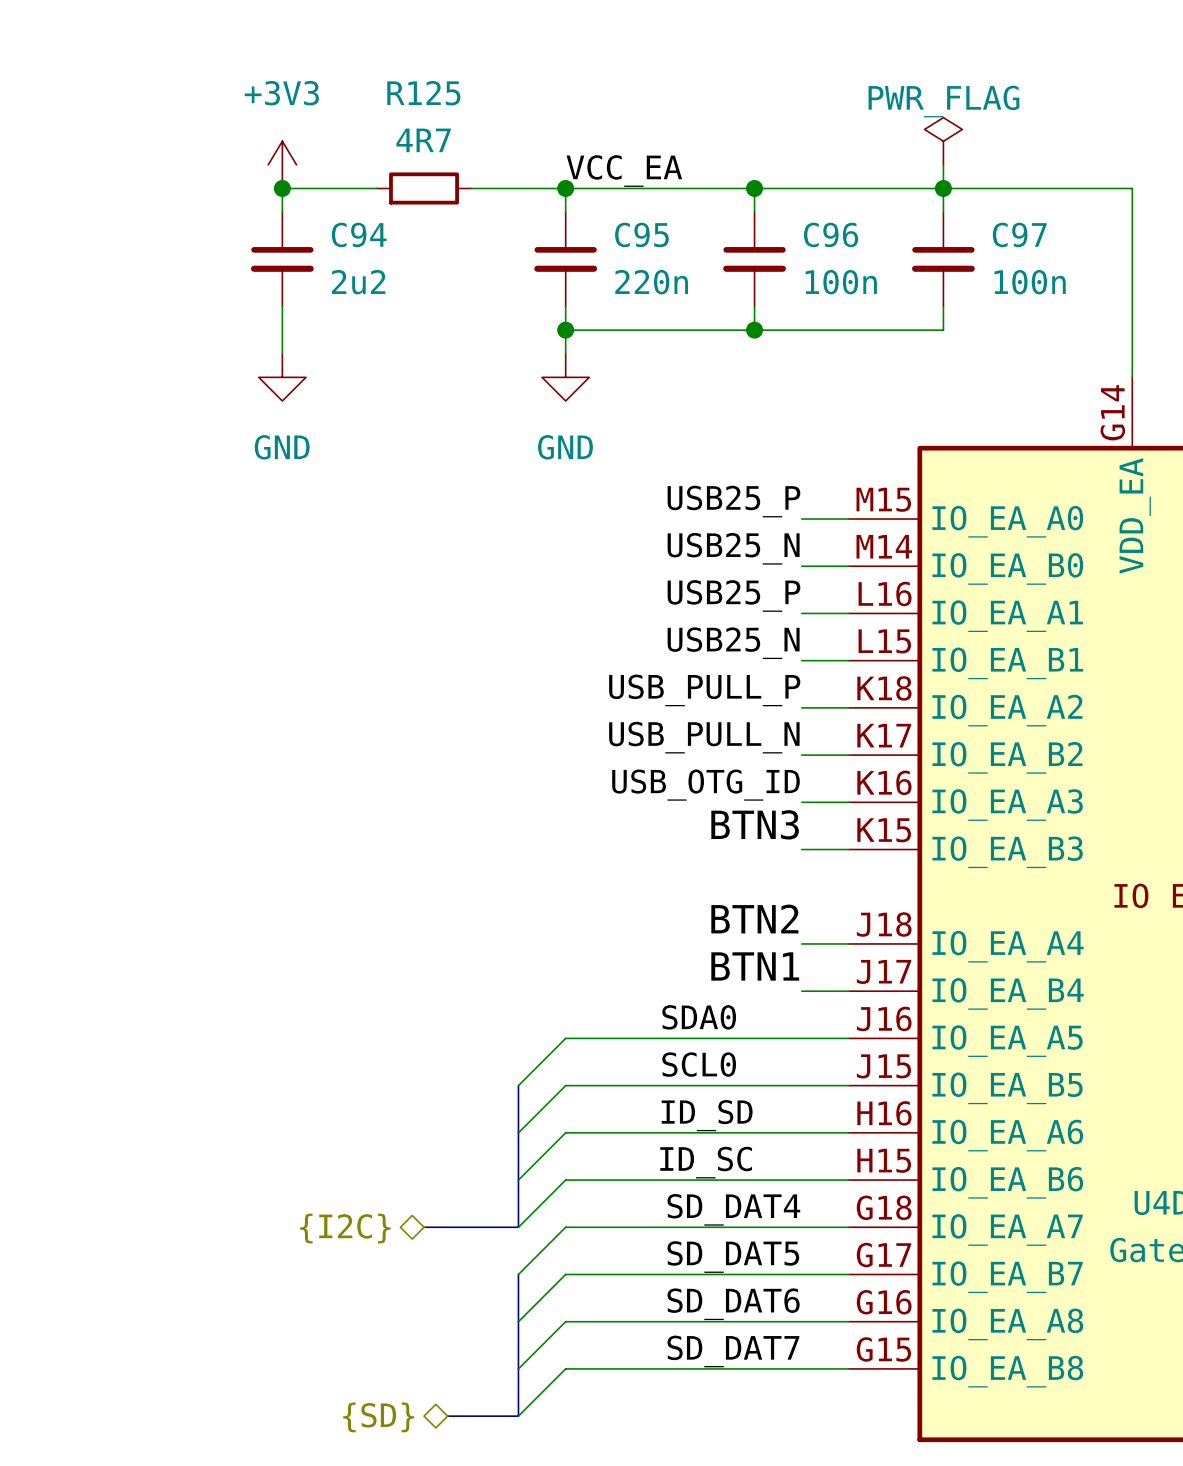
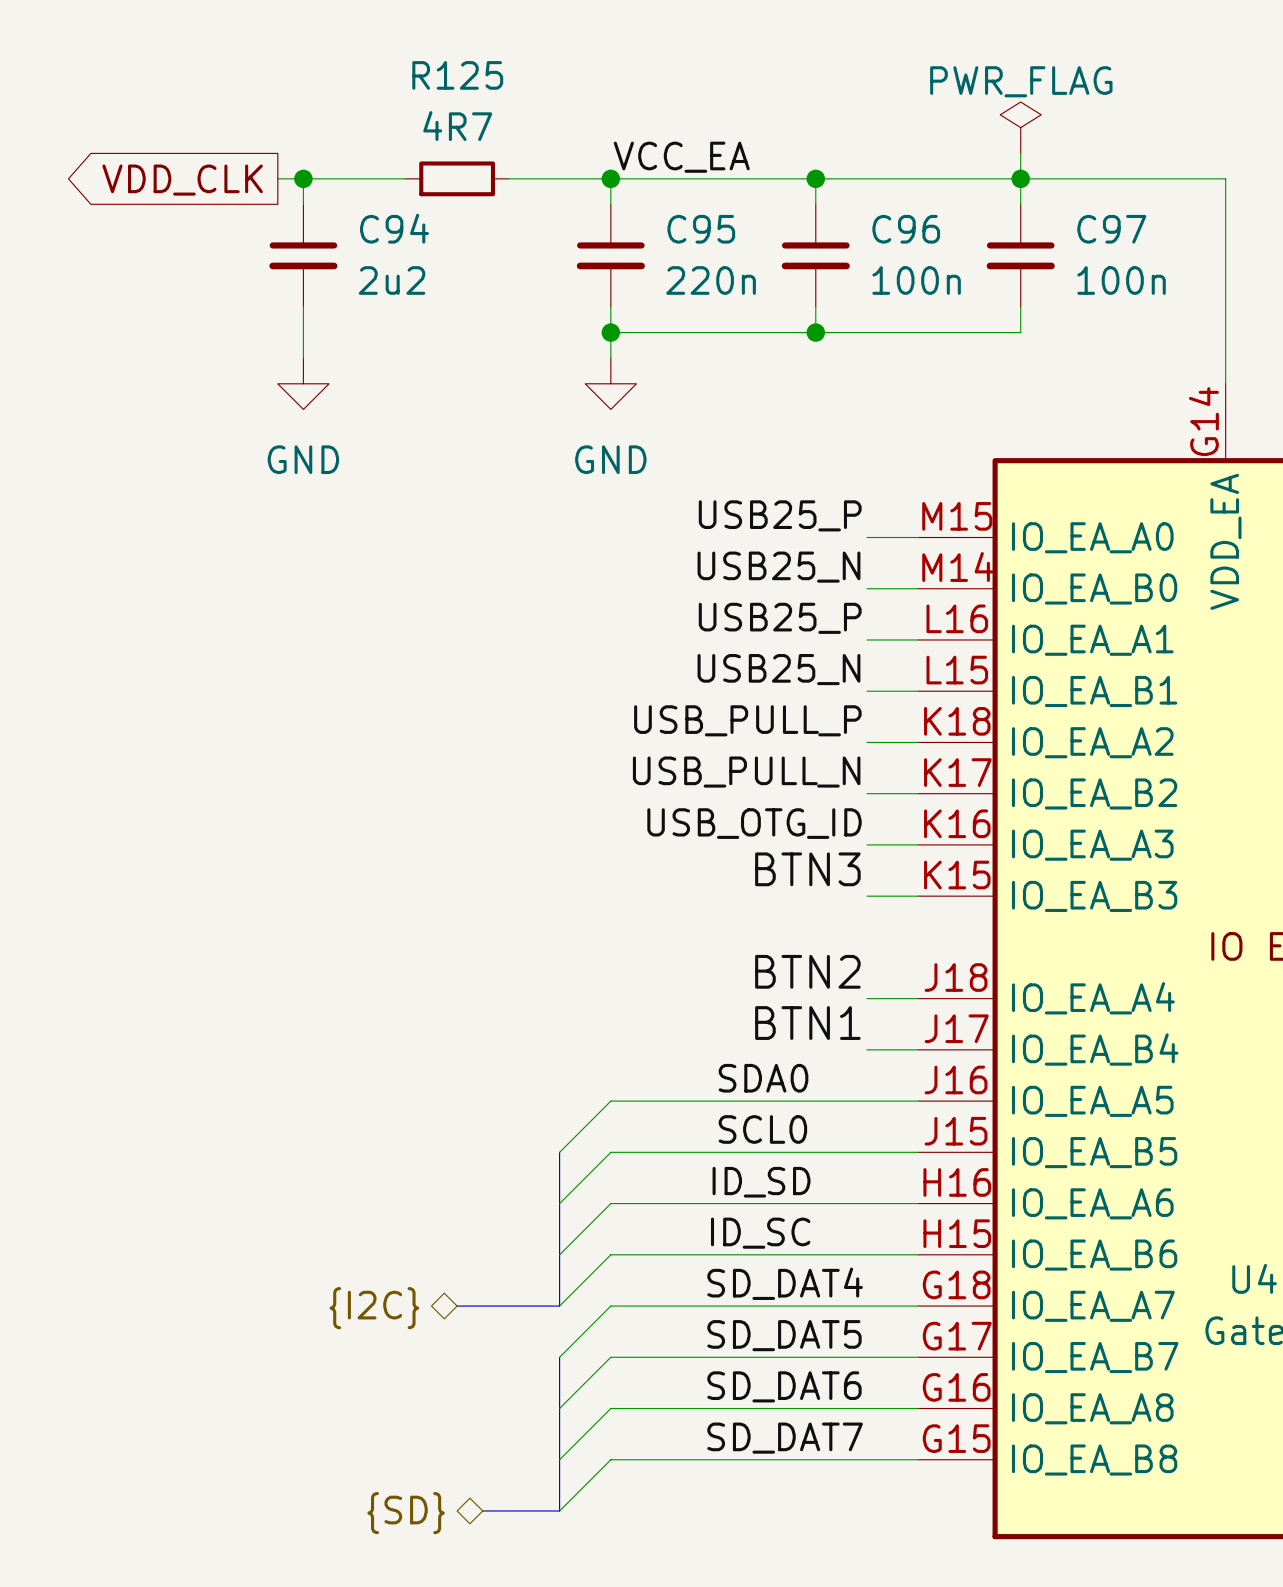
power symbol: +3V3 (282, 164) -> none
wire: none -> (277, 178) (303, 178)
global label: none -> VDD_CLK (182, 180)

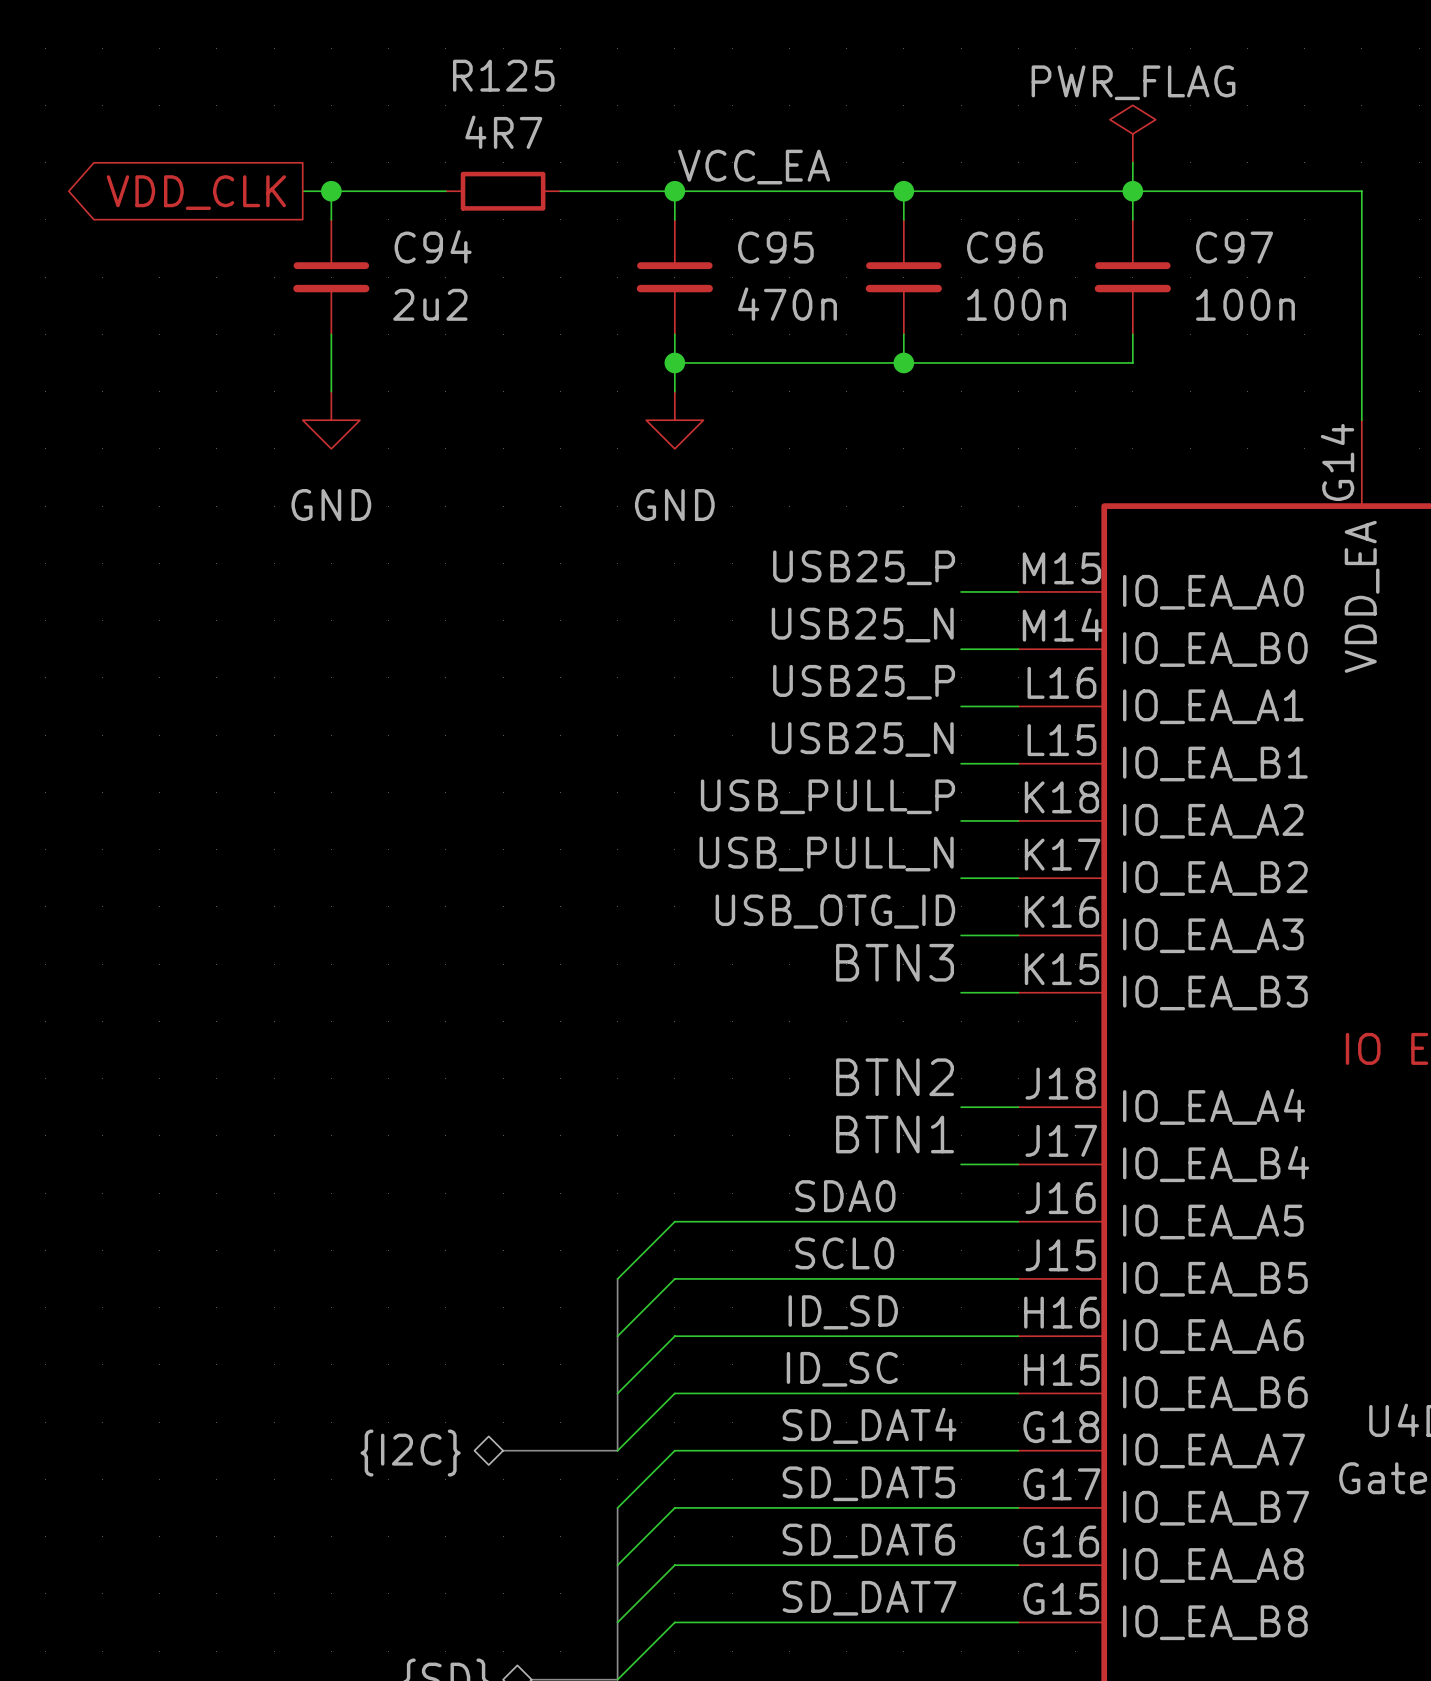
C95 value: 220n (711, 280) -> 470n (787, 304)

